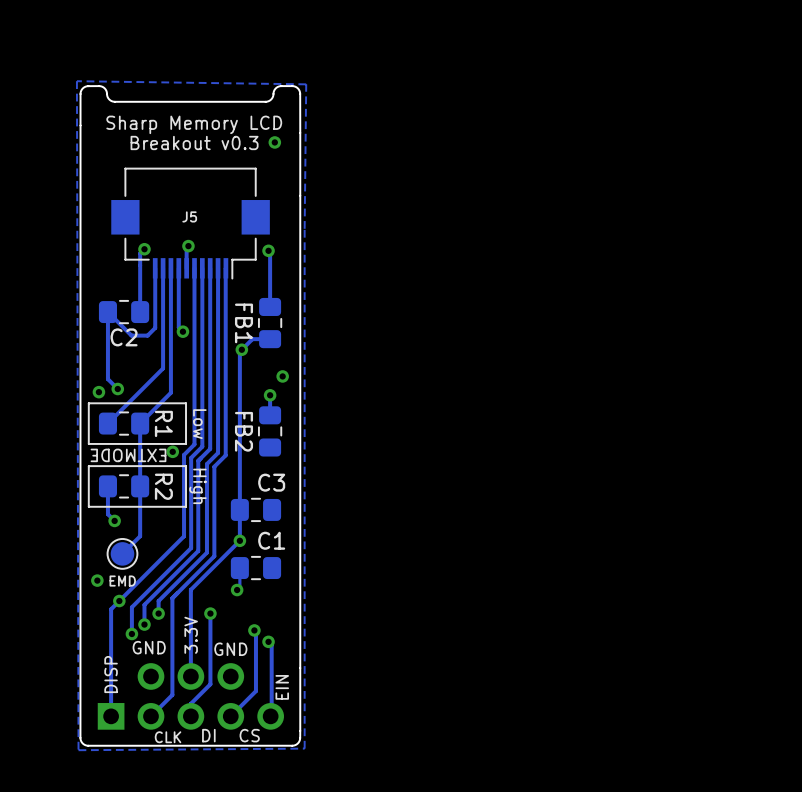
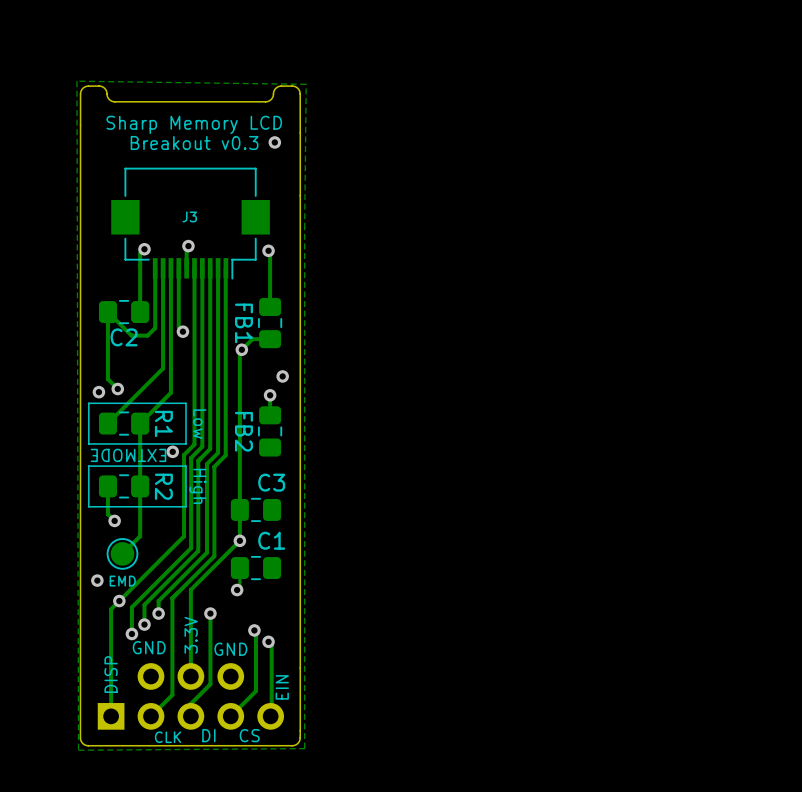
J5 name: J5 (189, 216) -> J3 (189, 216)

